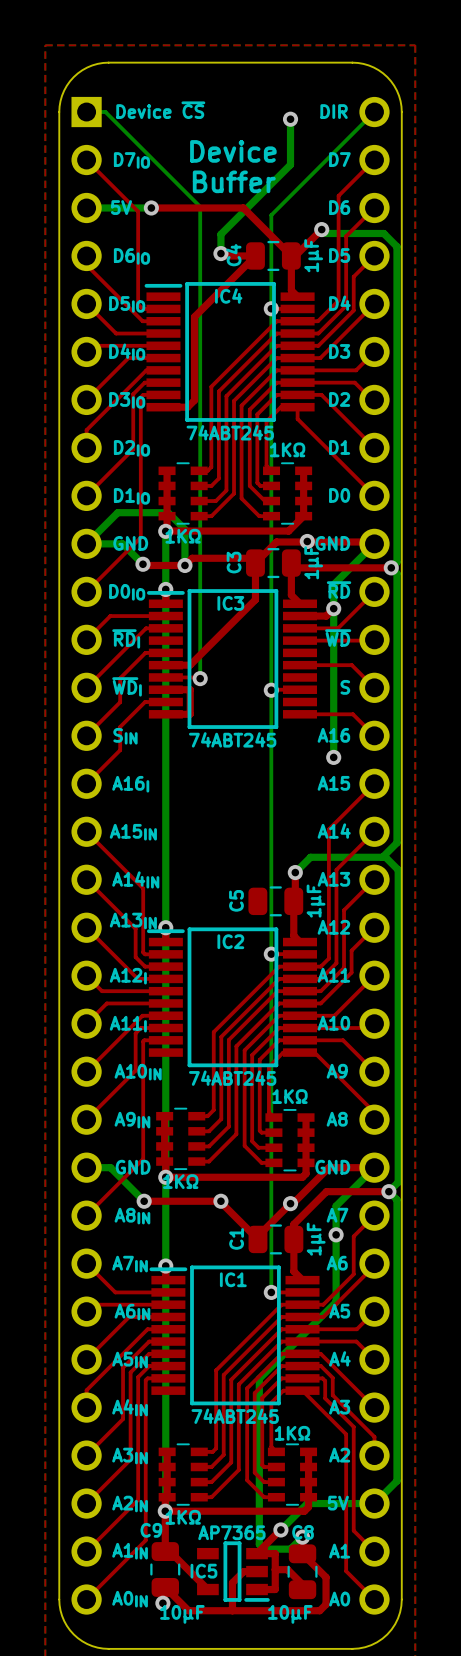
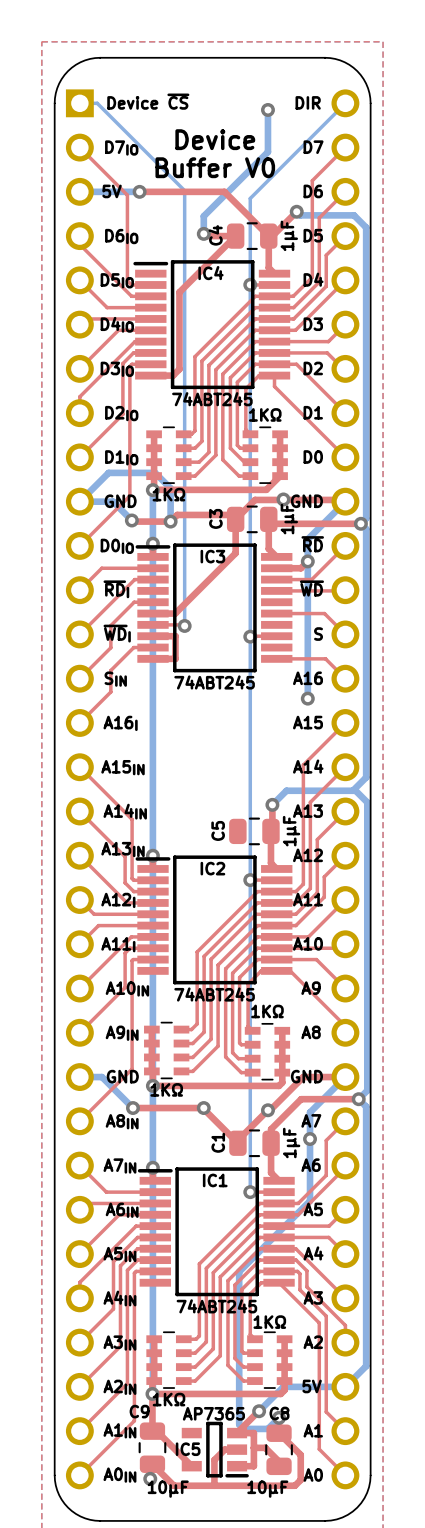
text: Buffer (234, 181) -> Buffer V0 (215, 167)

